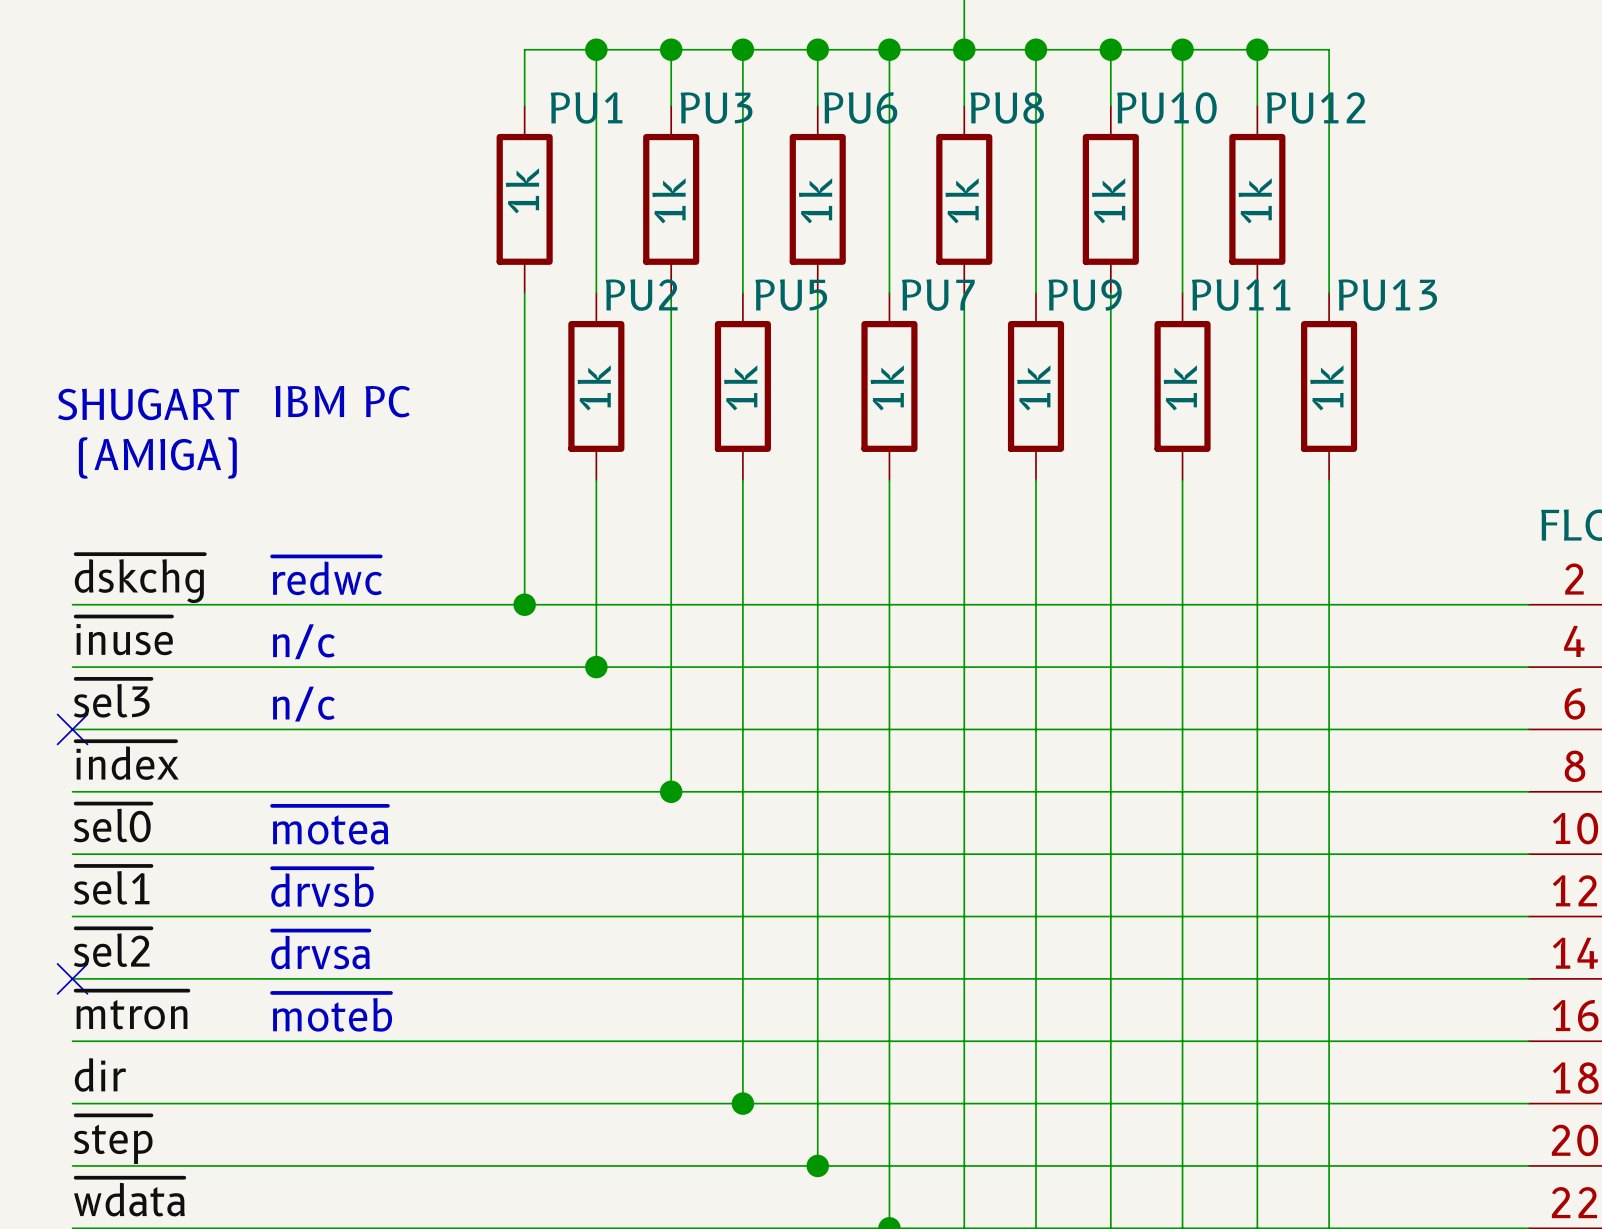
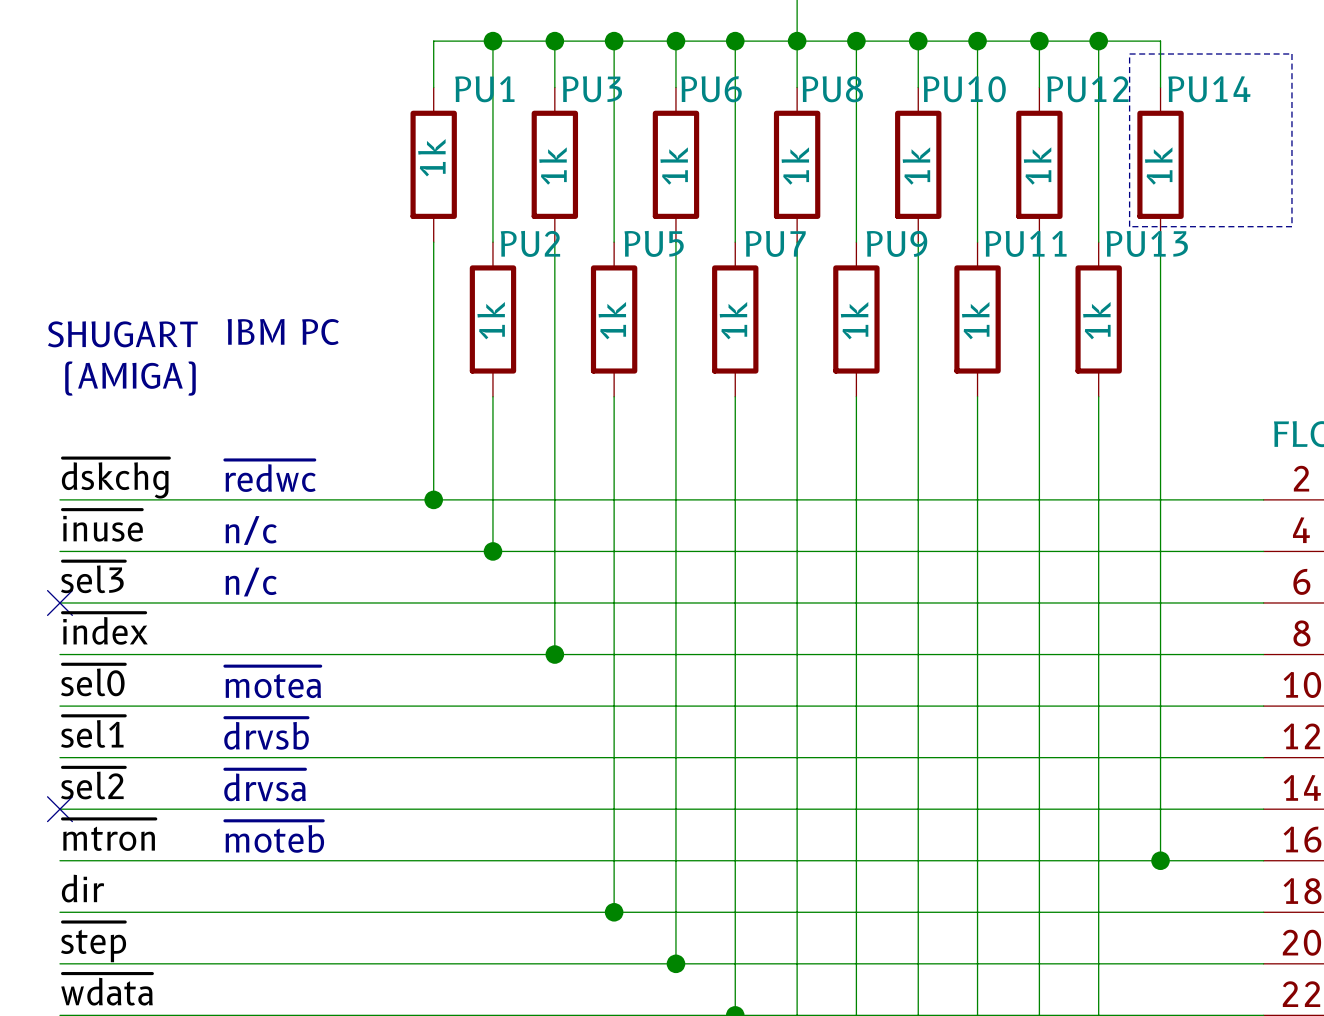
wire: none -> (1098, 41) (1160, 41) (1160, 87)
junction: none -> (1098, 41)
line: none -> (1129, 54) (1291, 54) (1291, 226) (1129, 226) (1129, 54)
PU14: none -> 1k (1160, 164)
wire: none -> (1160, 242) (1160, 860)
junction: none -> (1160, 860)

